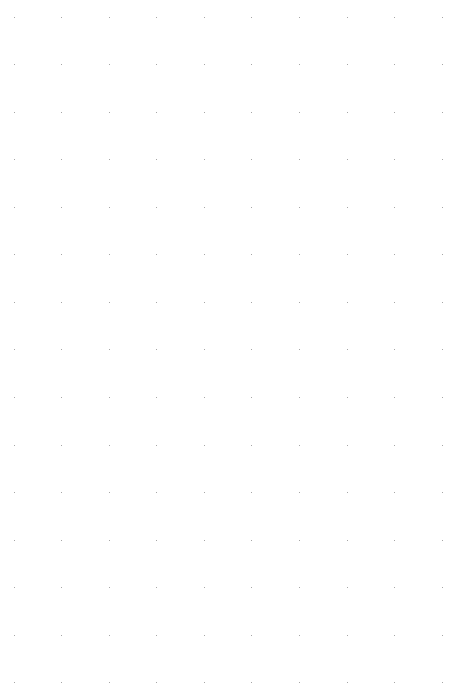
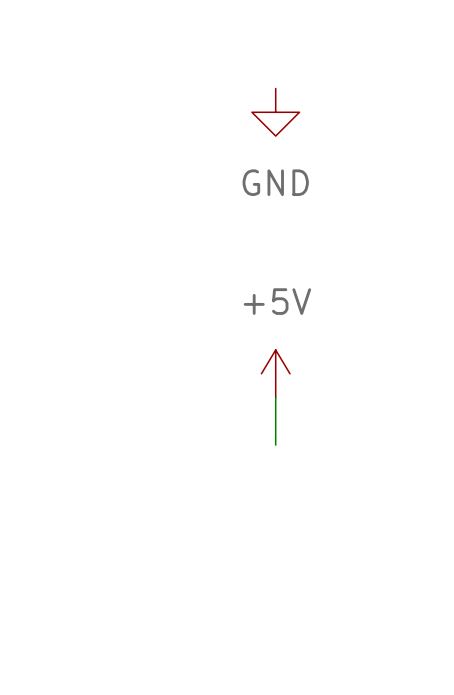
power symbol: none -> GND (275, 112)
power symbol: none -> +5V (275, 373)
wire: none -> (275, 397) (275, 445)

